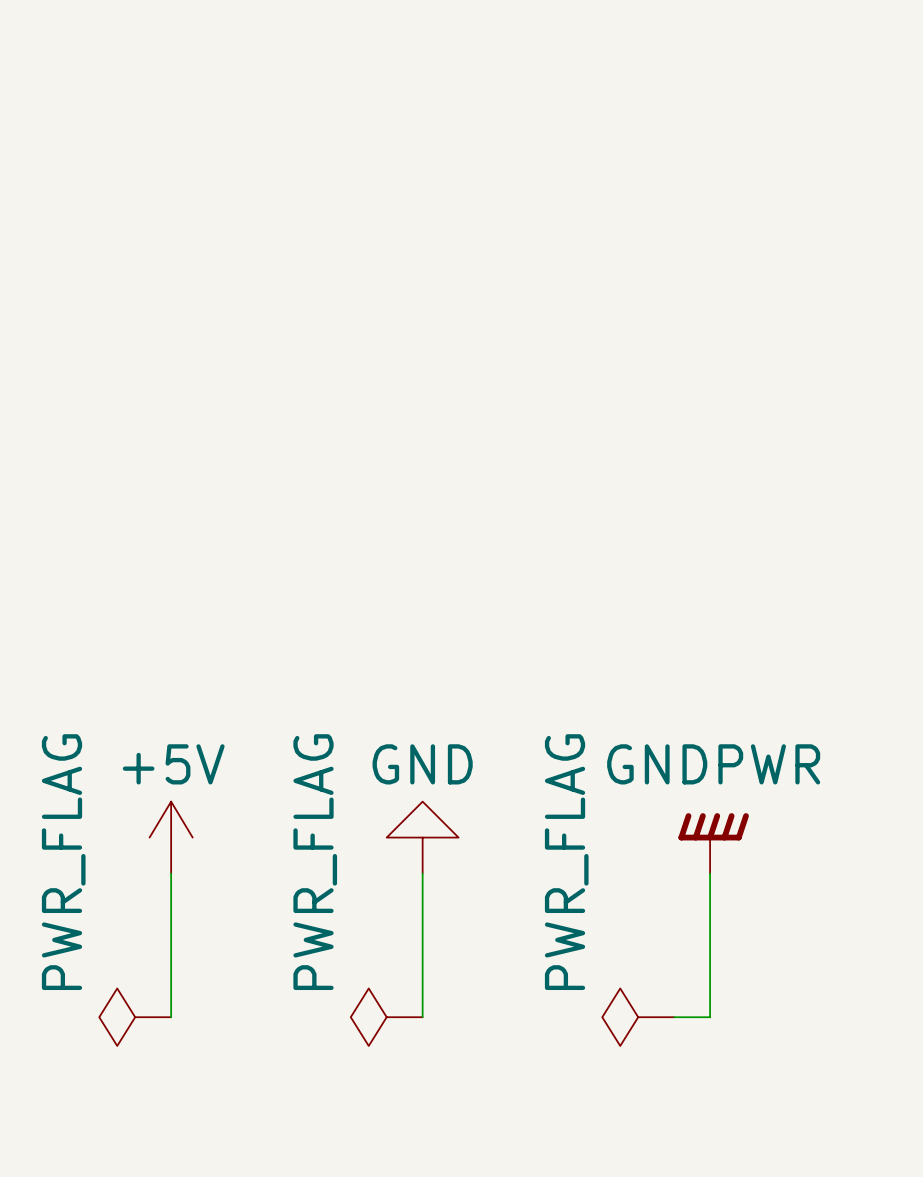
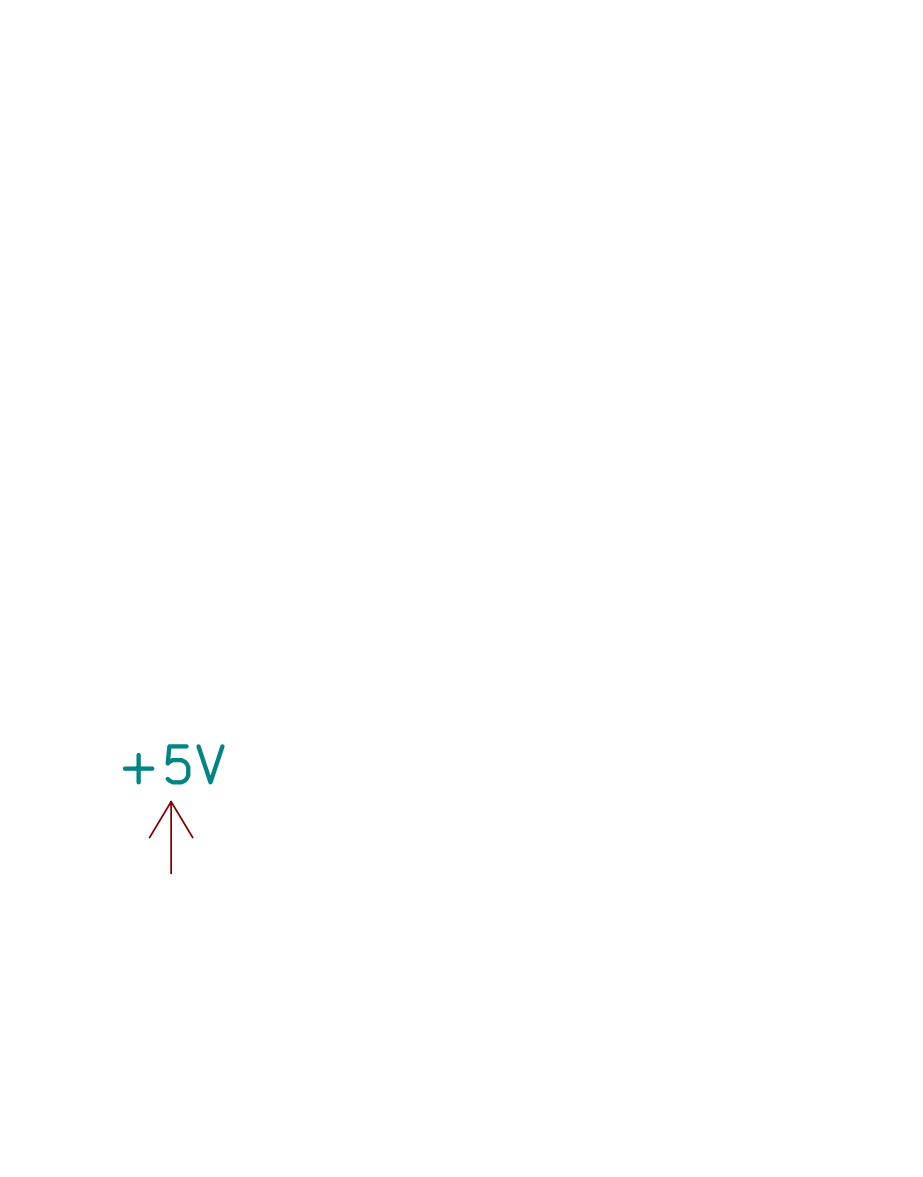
power symbol: GND (422, 837) -> none
power symbol: GNDPWR (713, 843) -> none
wire: (171, 873) (171, 1017) -> none
wire: (422, 873) (422, 1017) -> none
wire: (710, 873) (710, 1017) (674, 1017) -> none
power symbol: PWR_FLAG (135, 1017) -> none
power symbol: PWR_FLAG (386, 1017) -> none
power symbol: PWR_FLAG (638, 1017) -> none

